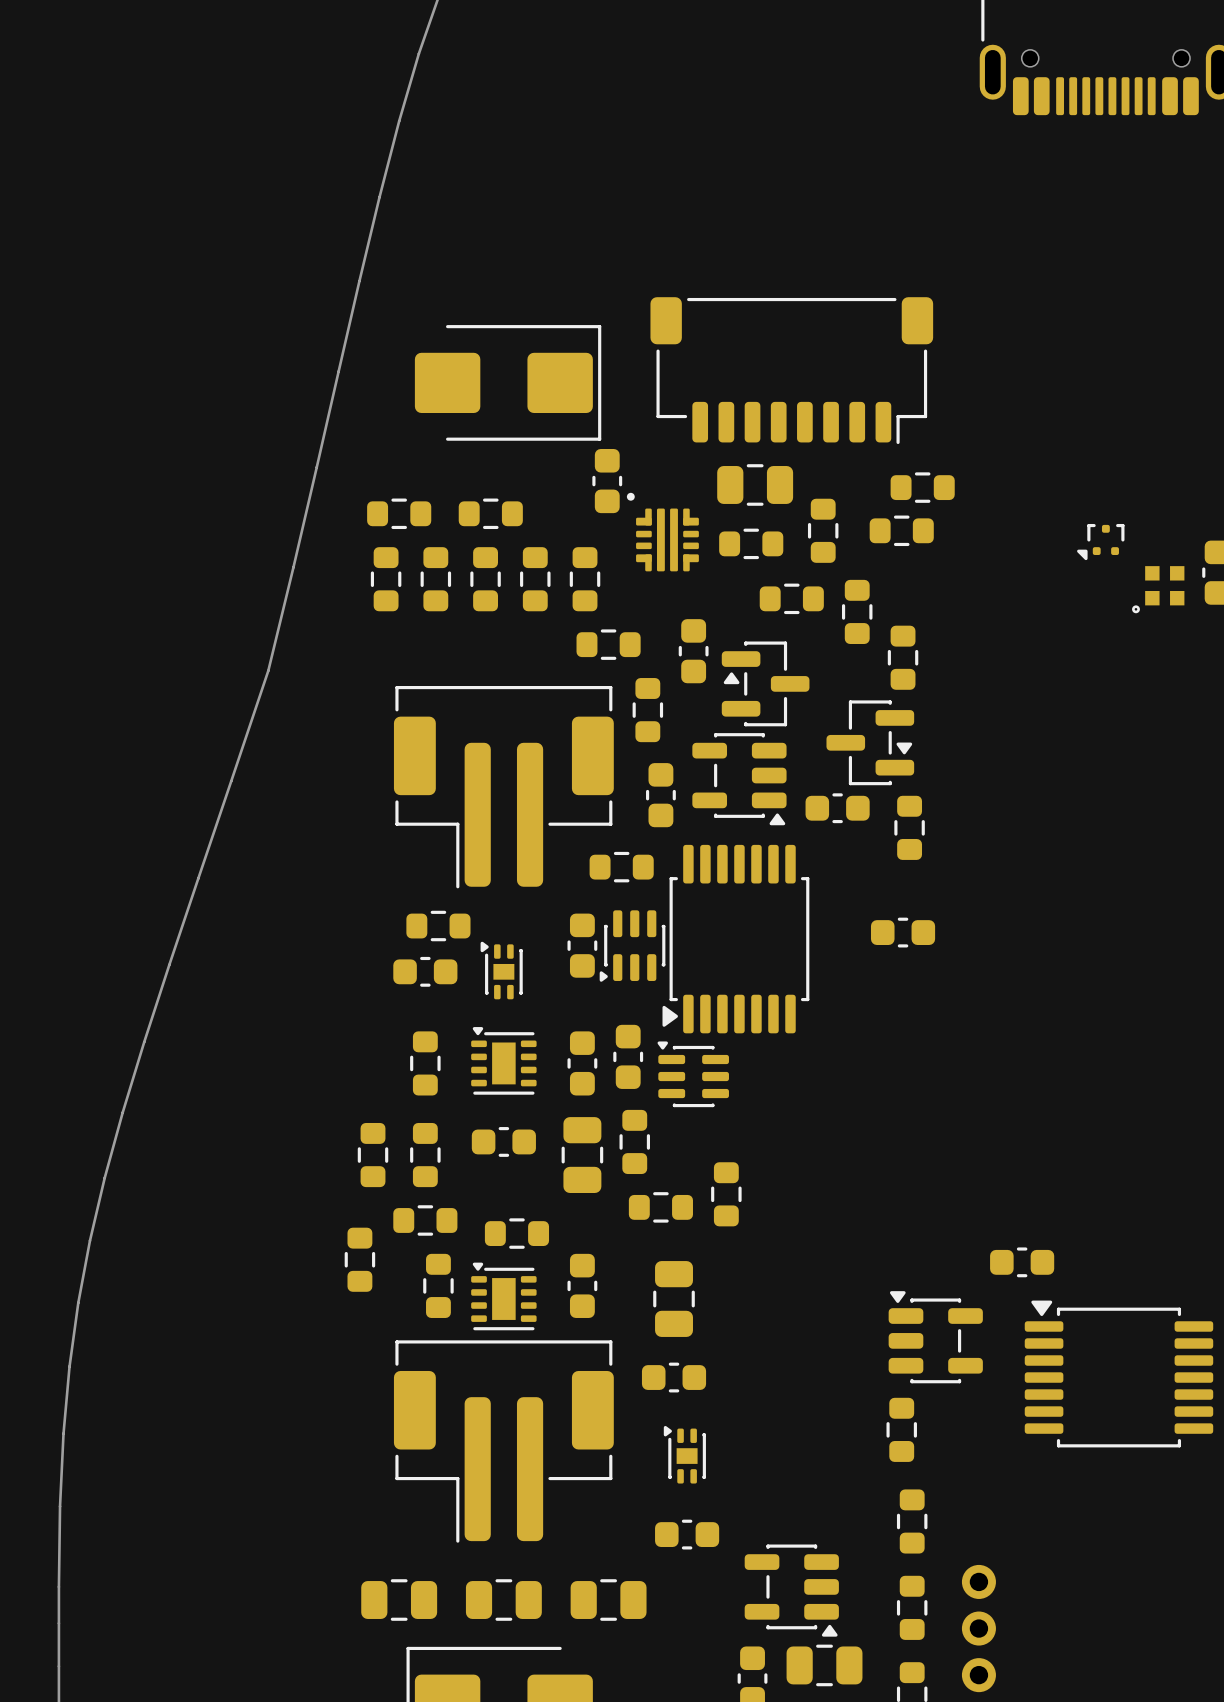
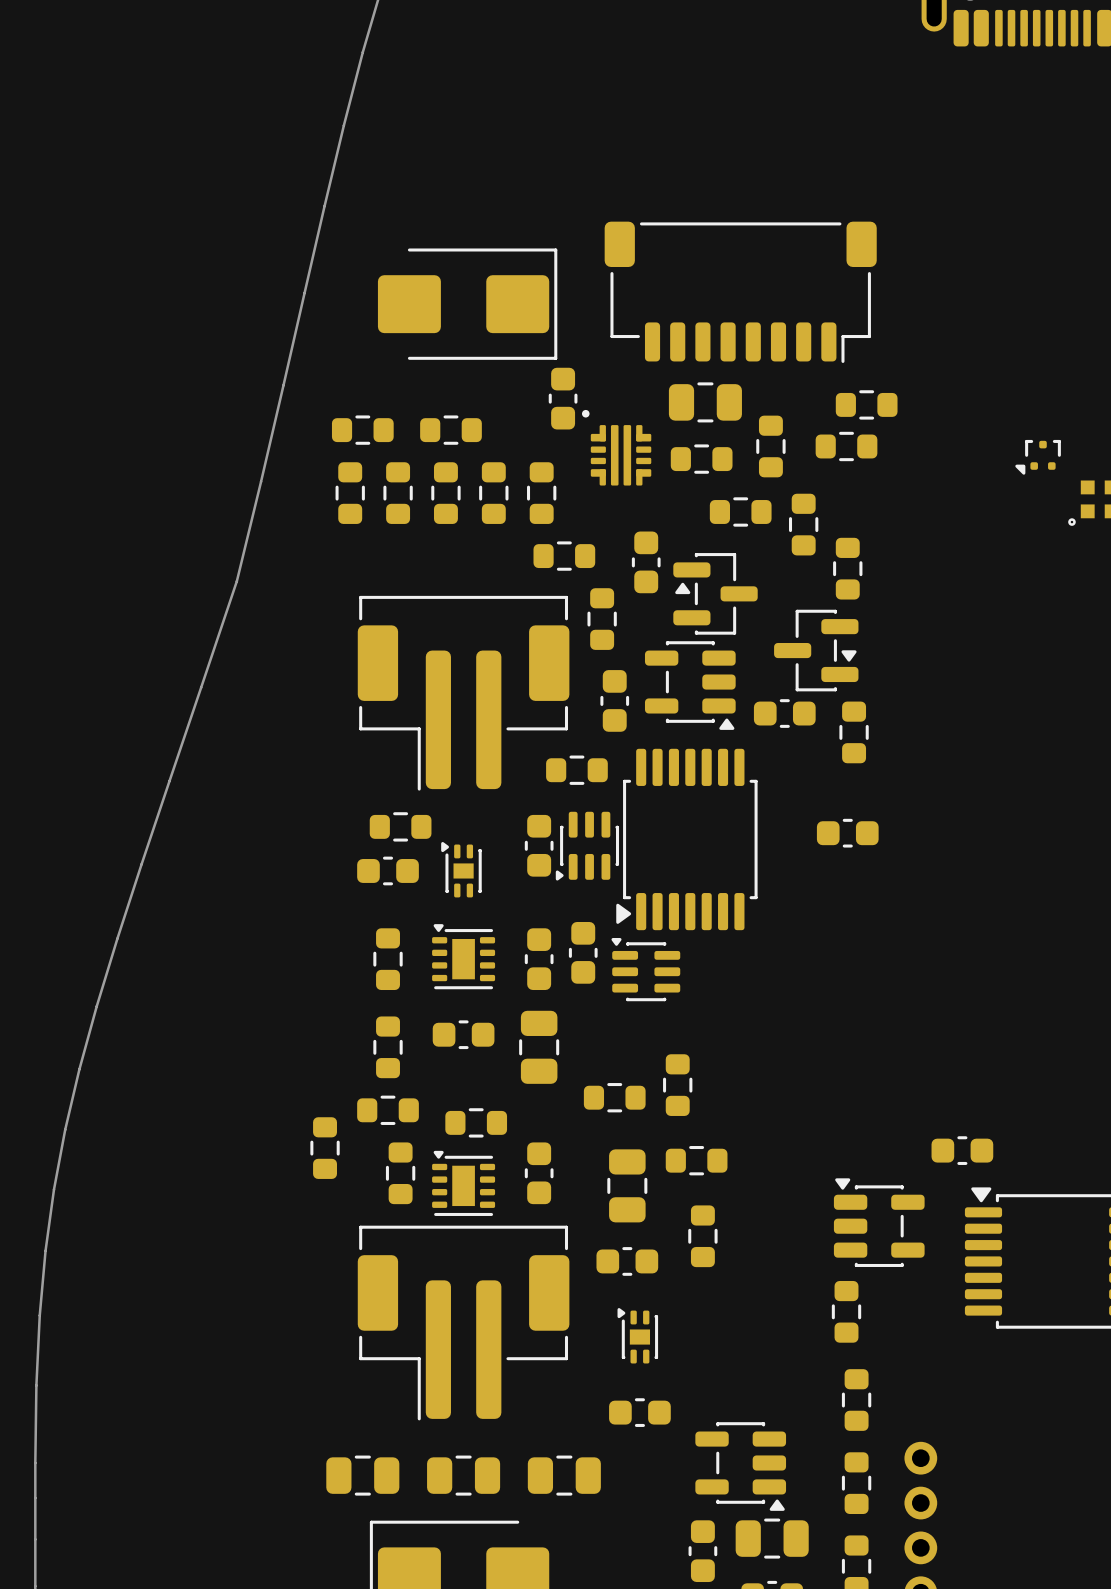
part: (634, 1141) -> none
part: (373, 1155) -> none
part: none -> (696, 1160)
part: none -> (702, 1236)

